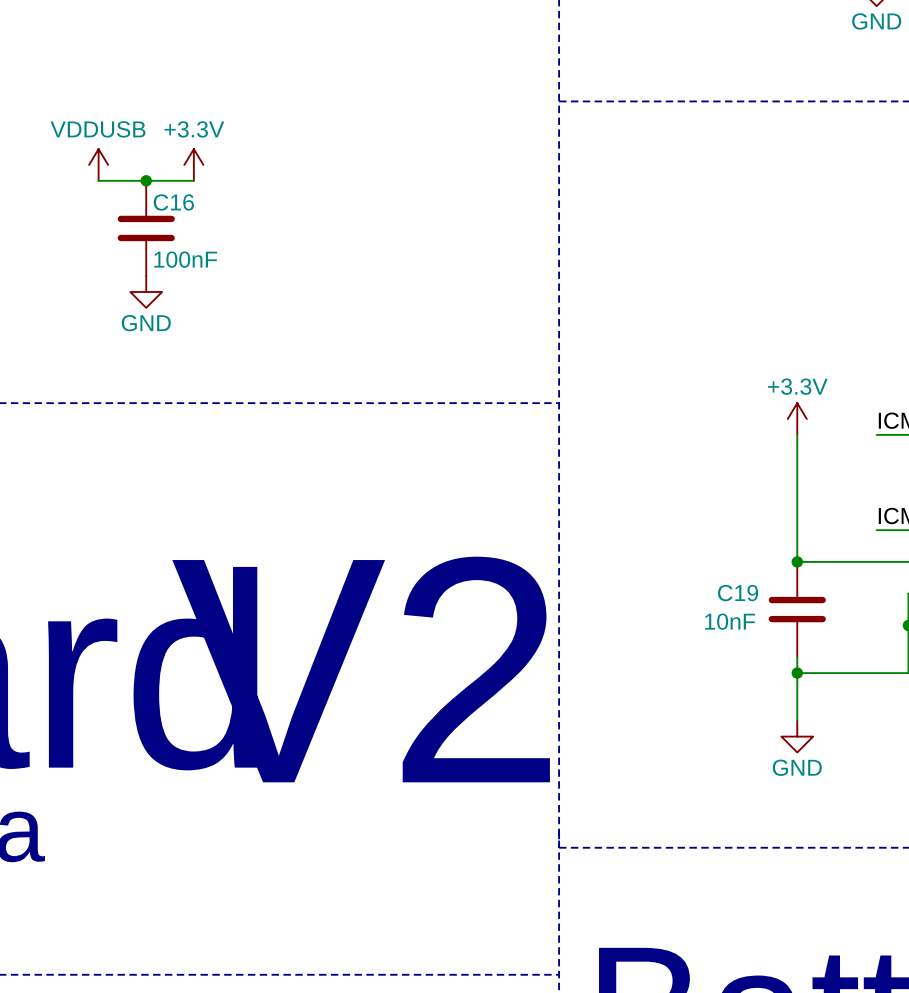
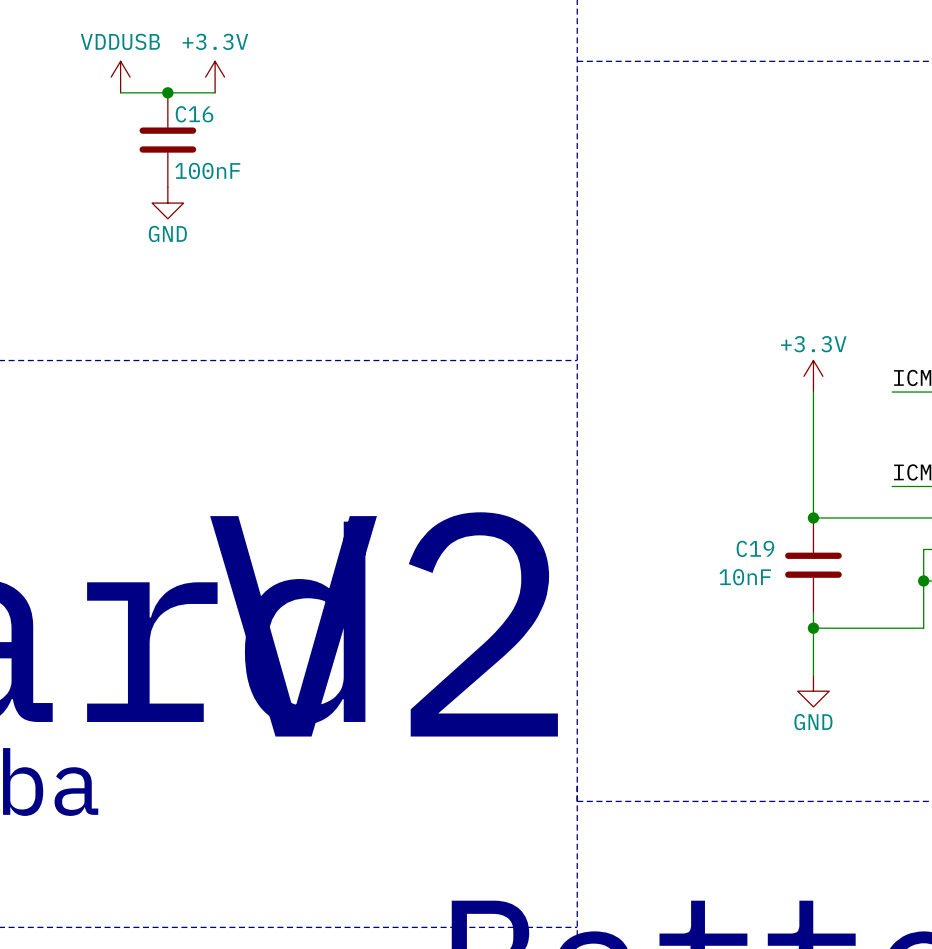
power symbol position: VDDUSB (98, 164) -> VDDUSB (120, 77)
power symbol position: +3.3V (193, 164) -> +3.3V (215, 77)
wire: (98, 180) (193, 180) -> (120, 92) (215, 92)
junction position: (146, 180) -> (167, 92)
C16 position: (146, 228) -> (167, 140)
power symbol position: GND (146, 291) -> GND (167, 203)

